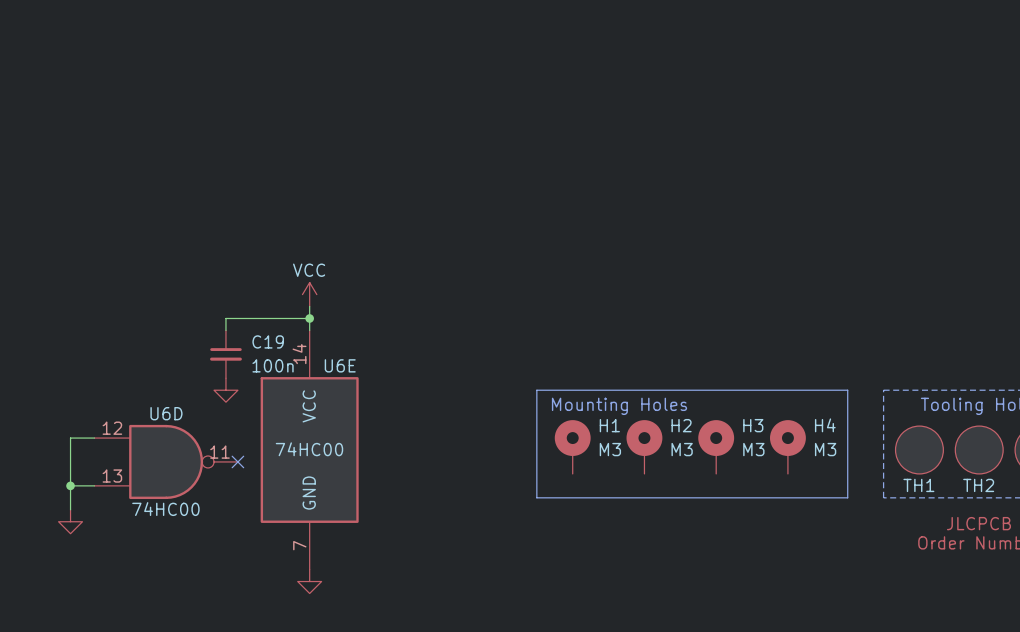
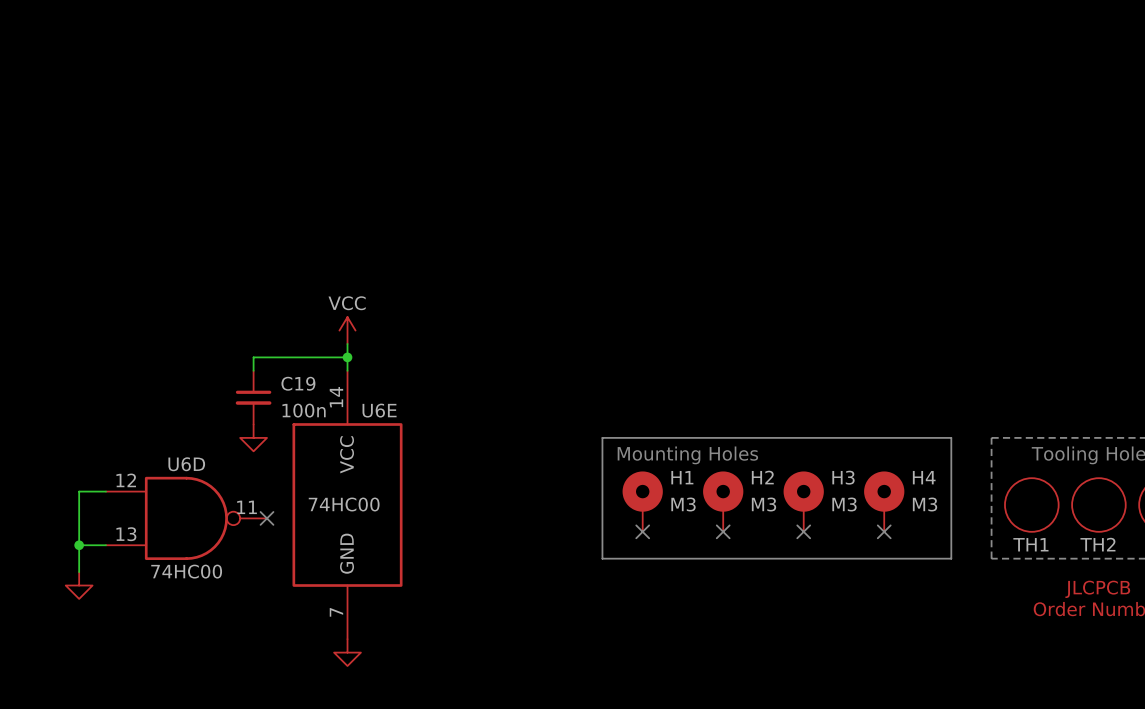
no-connect mark: none -> (642, 531)
no-connect mark: none -> (723, 531)
no-connect mark: none -> (803, 531)
no-connect mark: none -> (884, 531)

